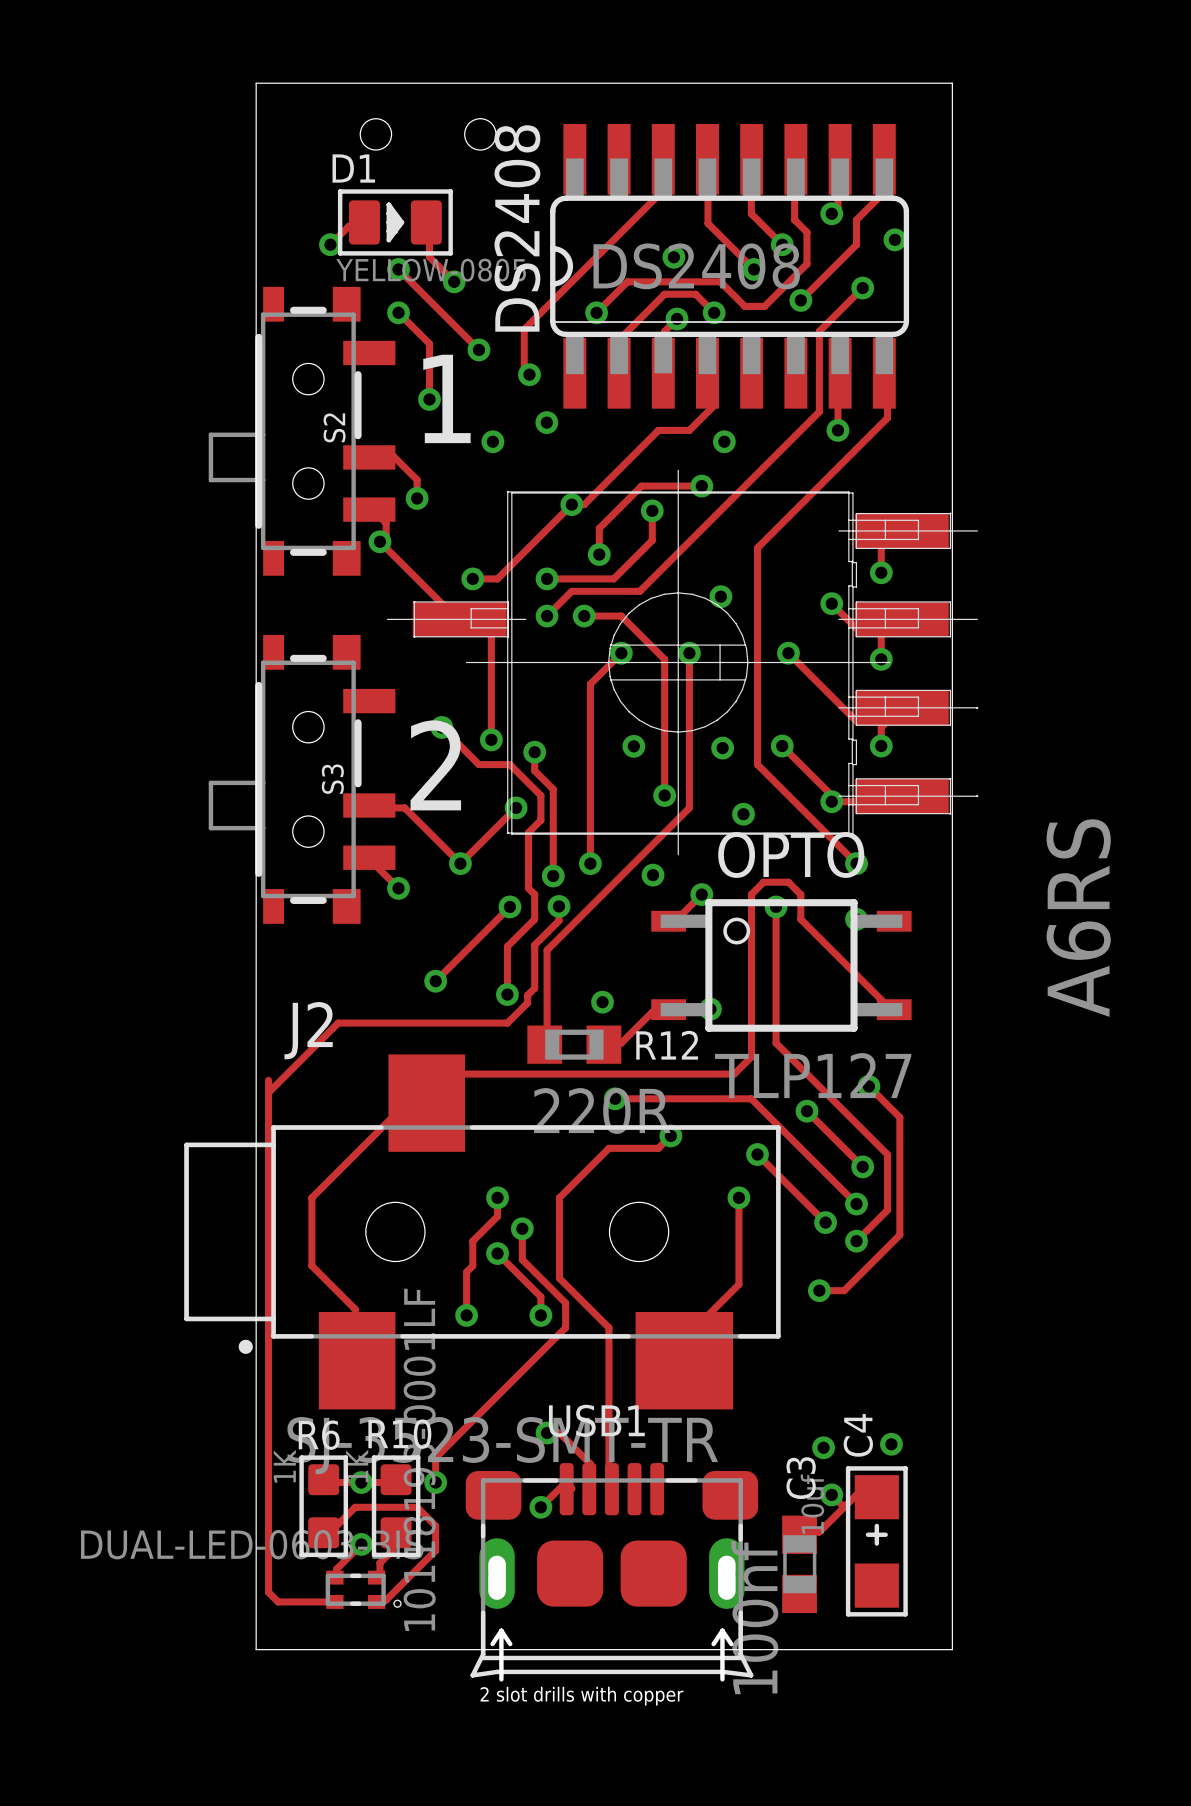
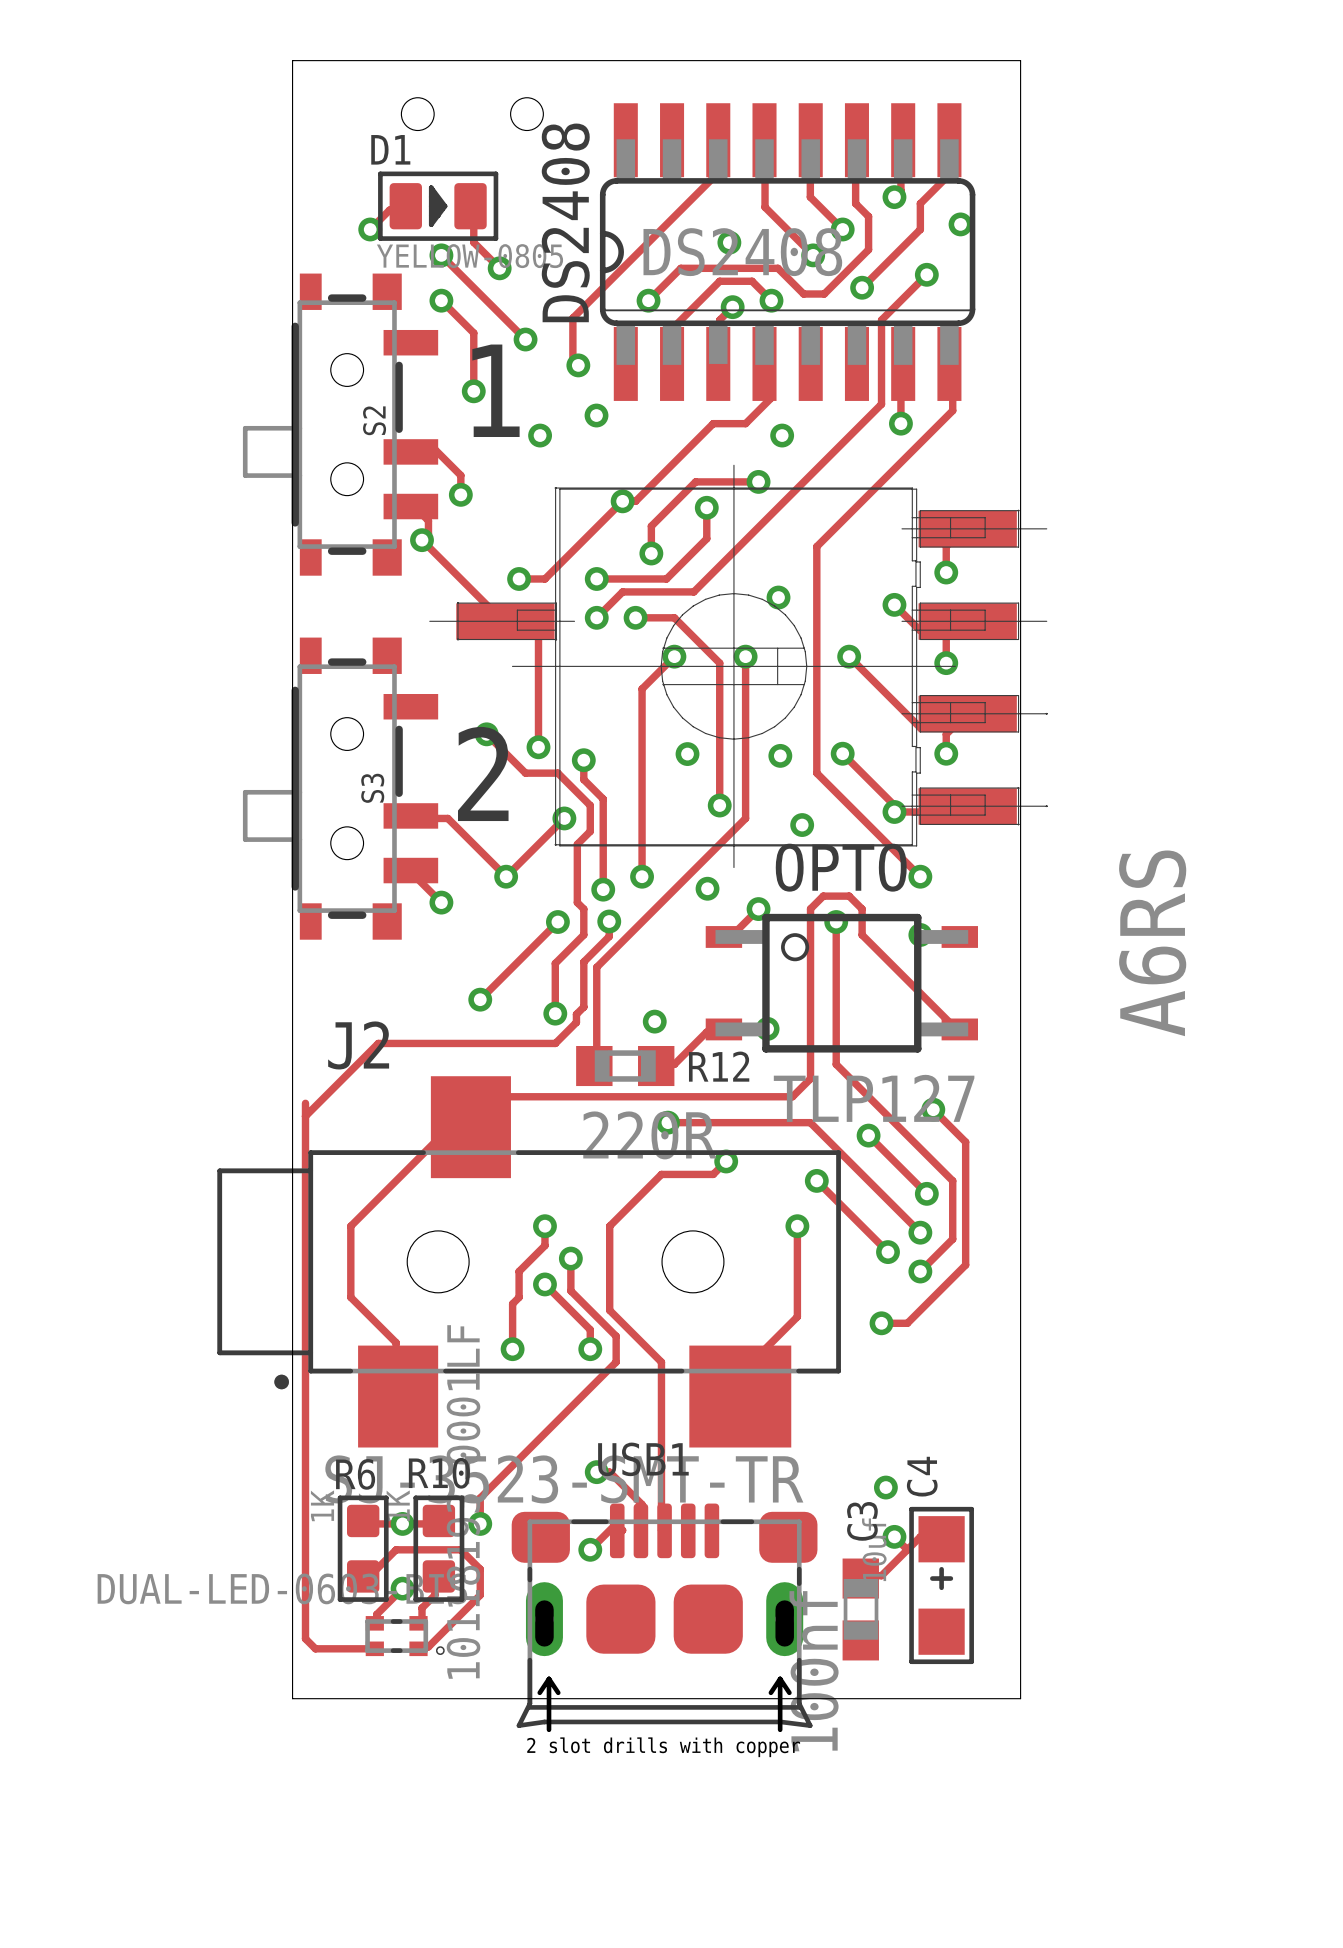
via: (891, 1444) -> none

